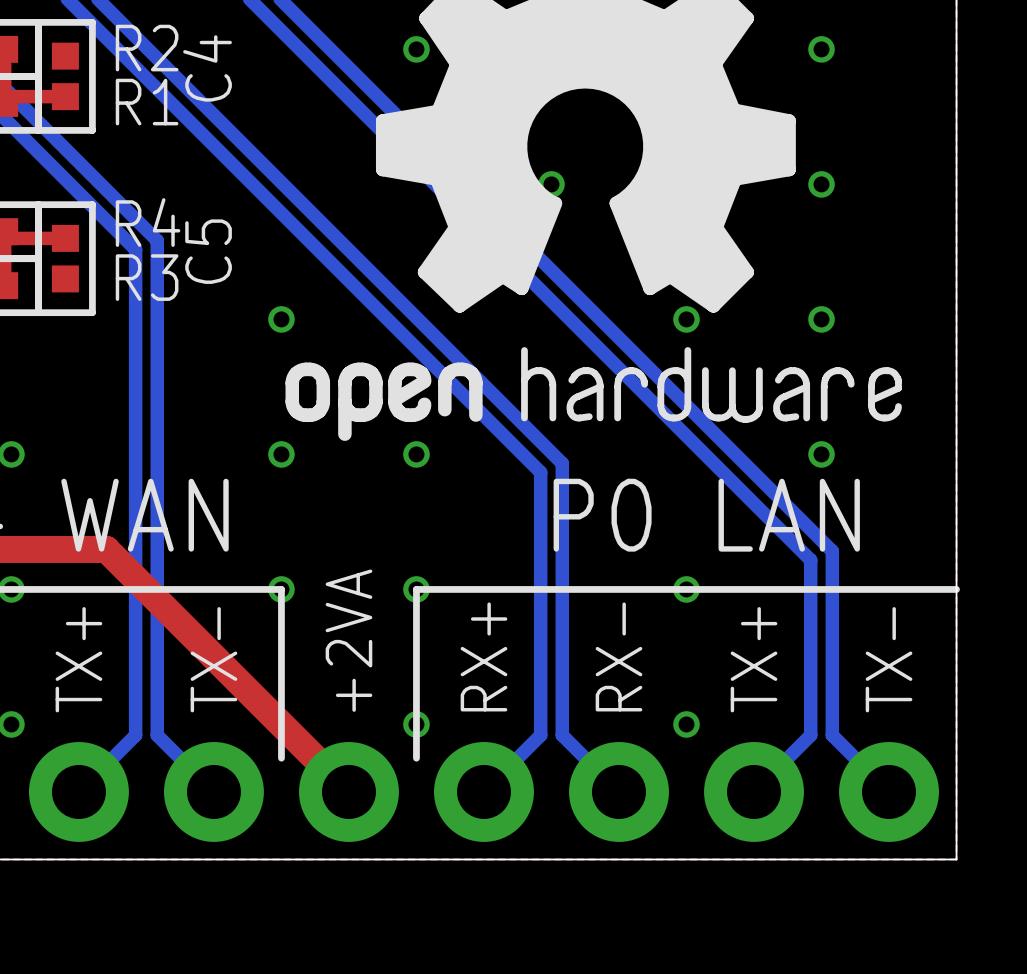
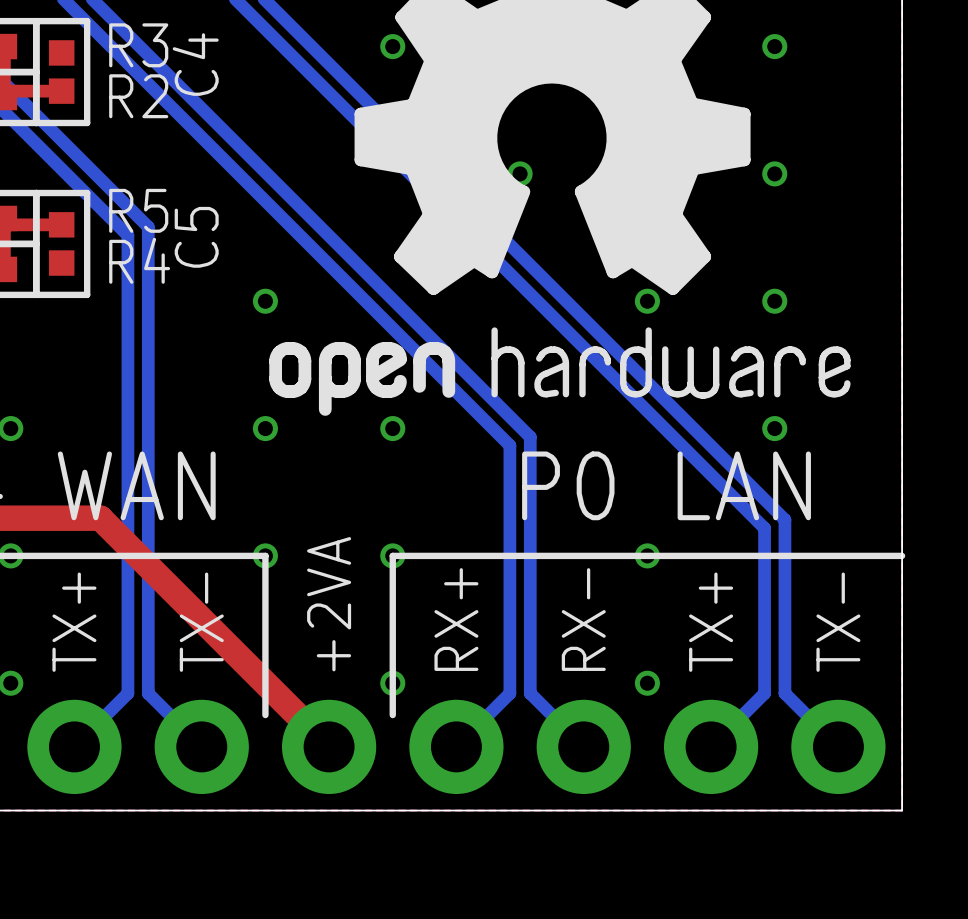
R2 name: R2 (147, 48) -> R3 (138, 45)
R1 name: R1 (147, 102) -> R2 (138, 96)
R4 name: R4 (148, 222) -> R5 (138, 210)
R3 name: R3 (147, 277) -> R4 (139, 260)

